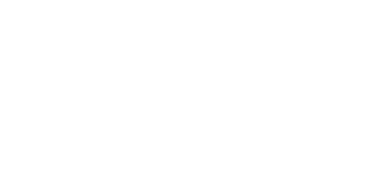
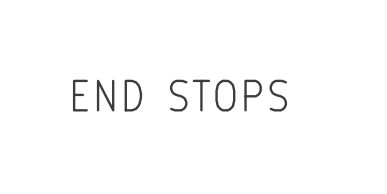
text: none -> END STOPS (180, 95)

